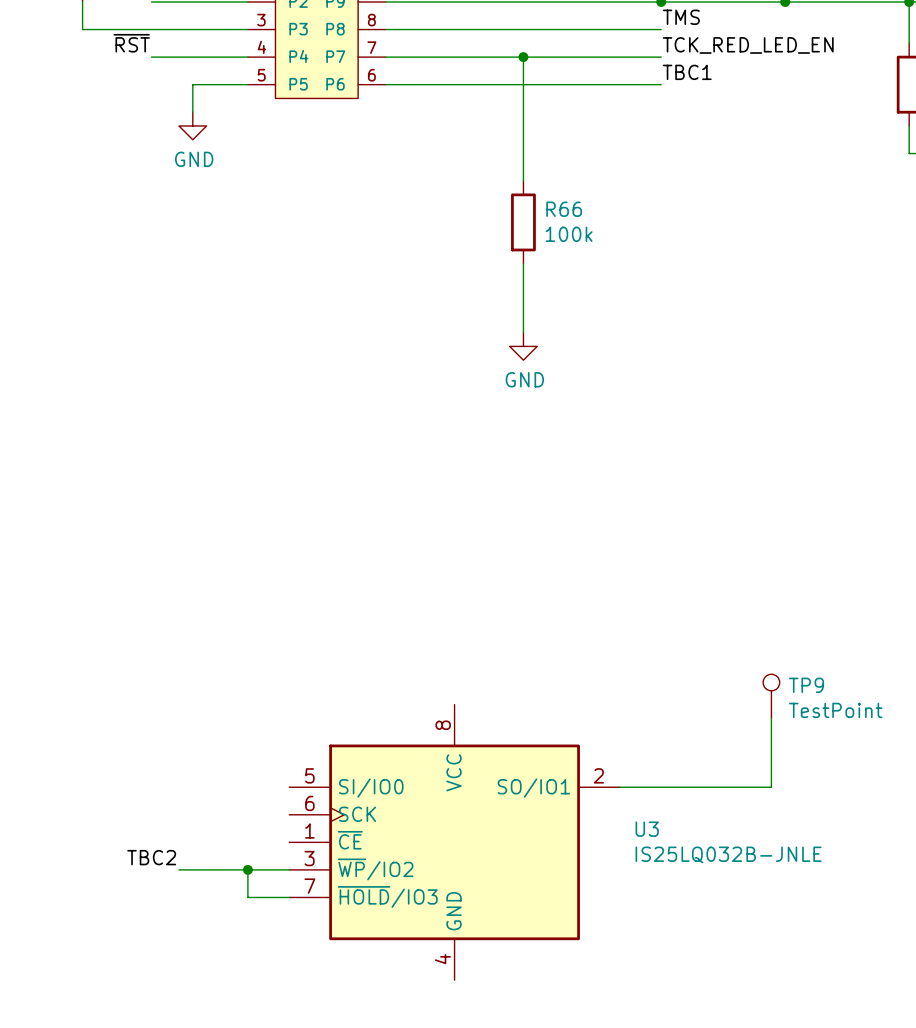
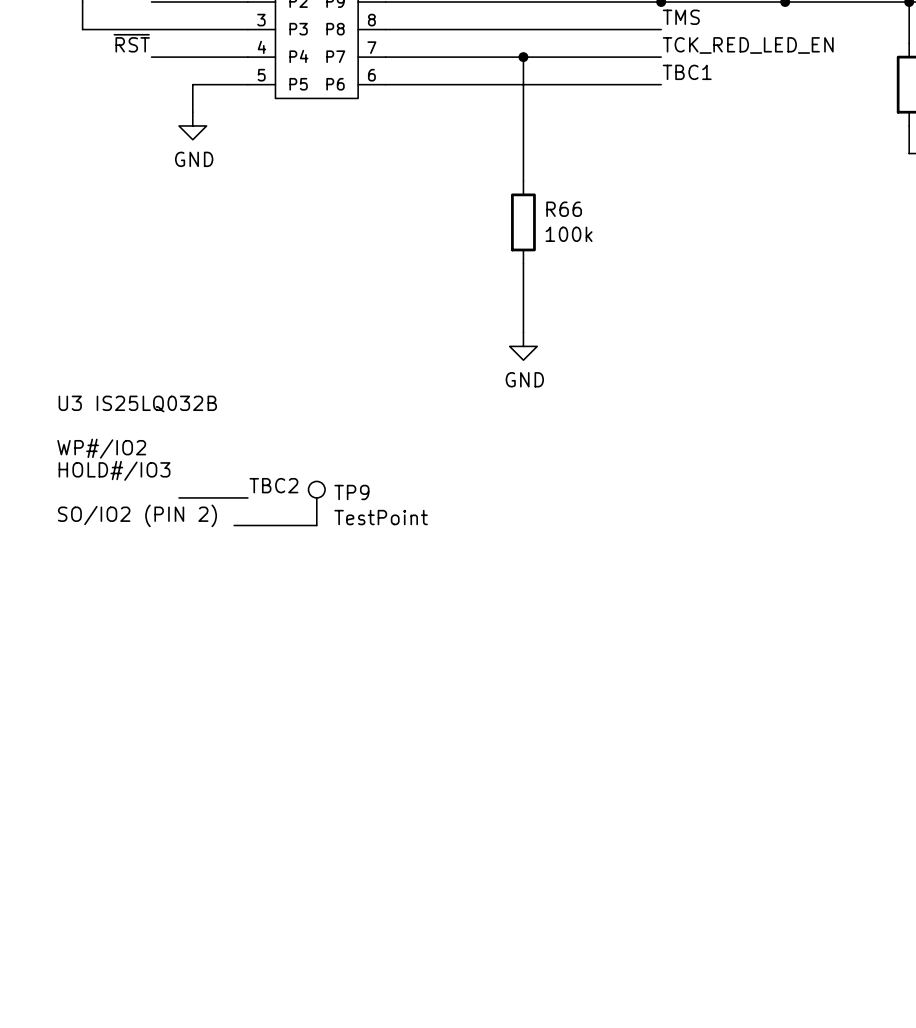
text: none -> U3 IS25LQ032B (137, 403)
text: none -> WP#/IO2 (101, 448)
text: none -> HOLD#/IO3 (114, 470)
label: none -> TBC2 (273, 485)
wire: none -> (179, 497) (247, 497)
text: none -> SO/IO2 (PIN 2) (137, 515)
wire: none -> (234, 525) (316, 525)
TP9 position: (771, 696) -> (316, 503)
wire: (771, 718) (771, 787) (619, 787) -> none
U3: IS25LQ032B-JNLE (454, 842) -> none
label: TBC2 (151, 857) -> none
wire: (179, 869) (289, 869) -> none
wire: (247, 869) (247, 897) (289, 897) -> none
junction: (247, 869) -> none

